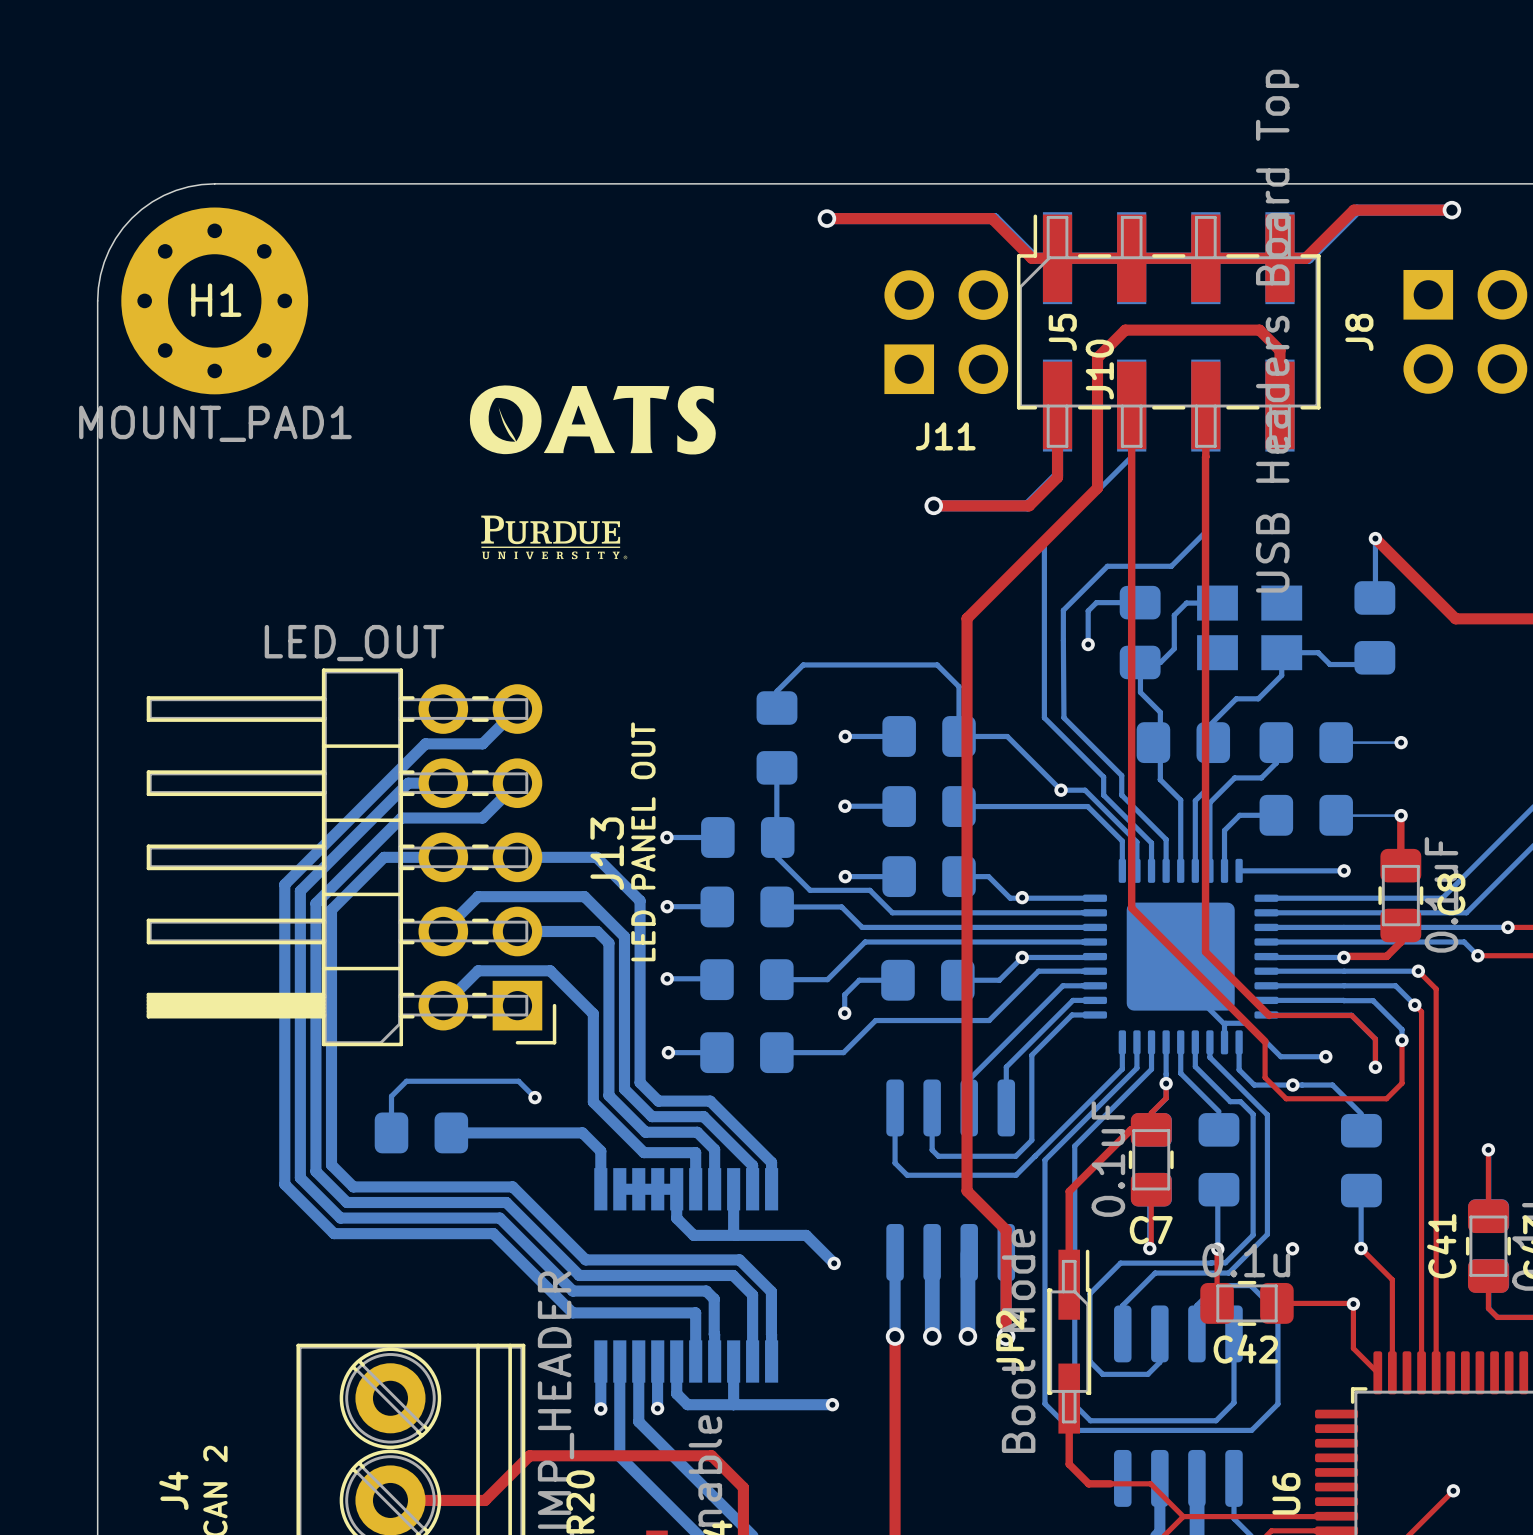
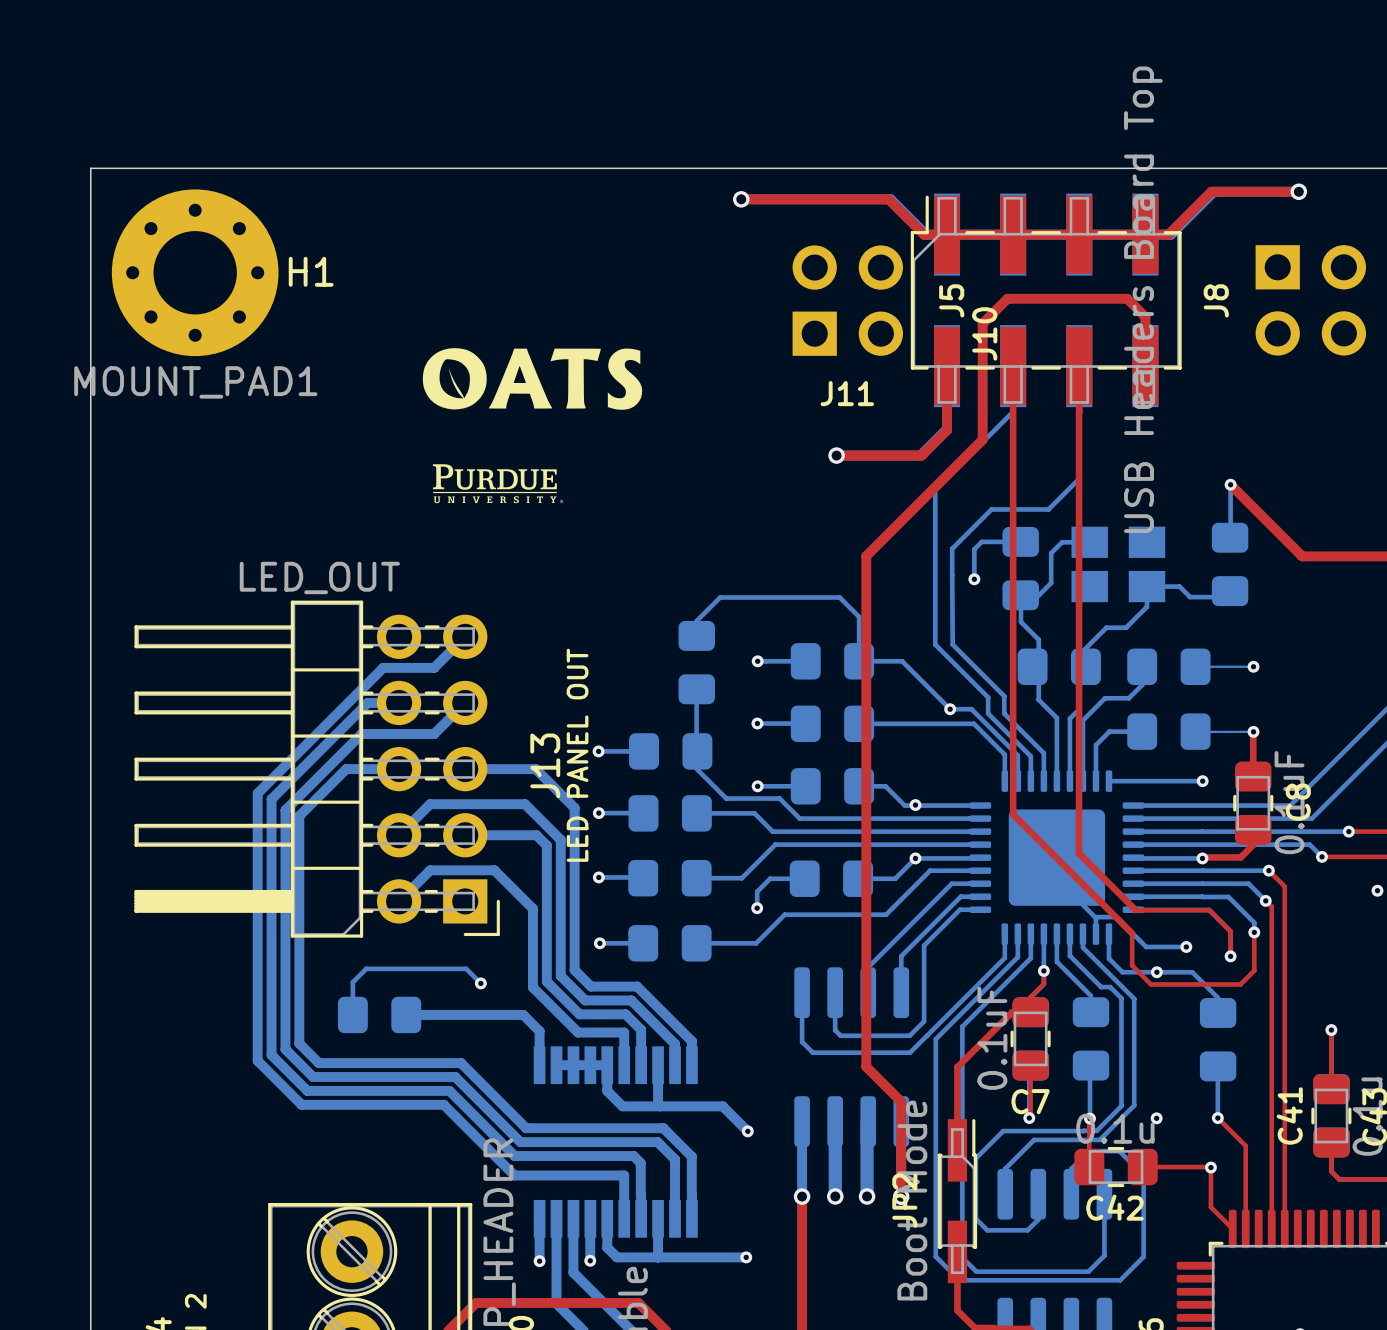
board edge: (214, 183) (176, 190) (152, 201) (131, 218) (115, 238) (104, 262) (97, 300) -> (195, 168) (90, 168) (90, 272)
H1 name position: H1 (216, 300) -> H1 (311, 271)

